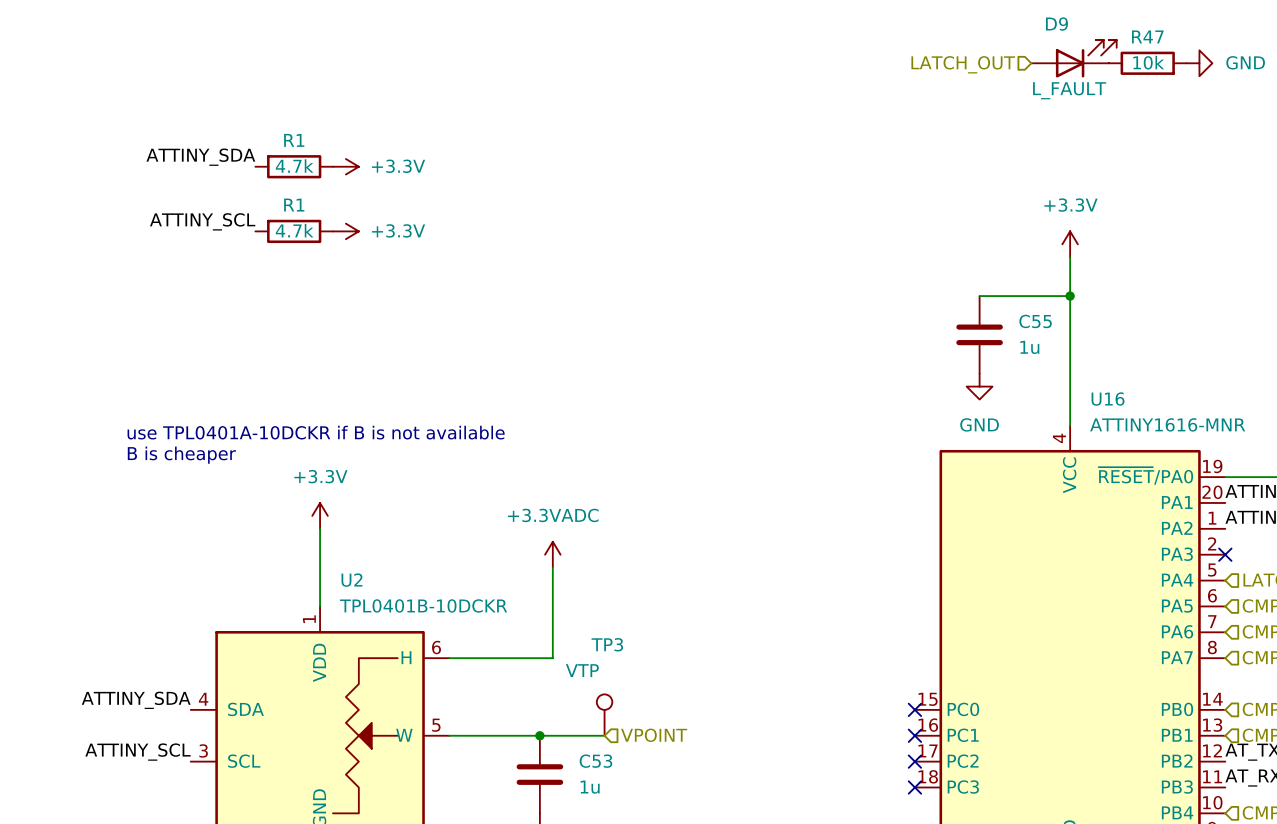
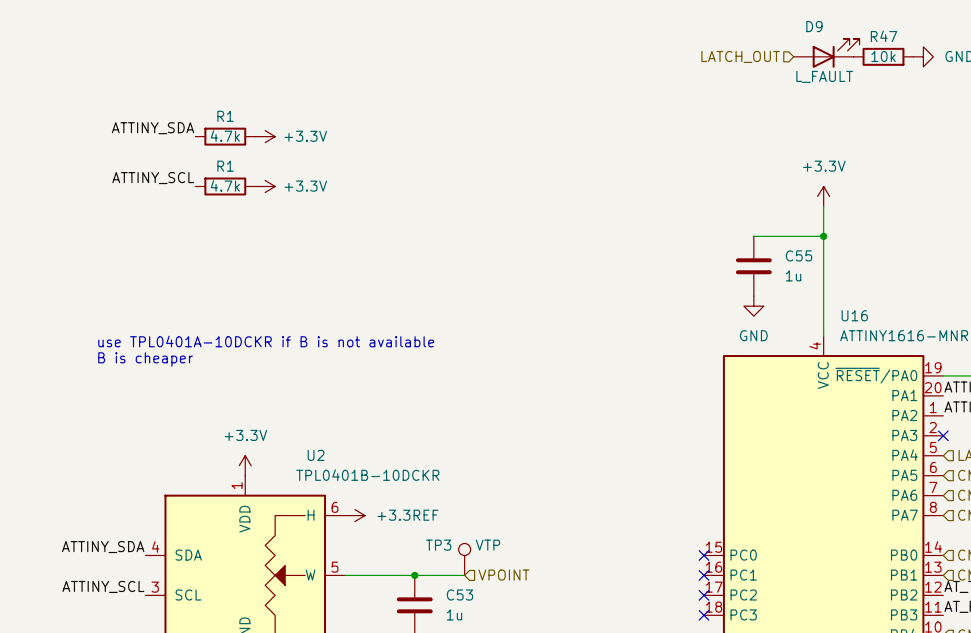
power symbol position: +3.3V (320, 515) -> +3.3V (245, 465)
wire: (320, 528) (320, 606) -> none
power symbol: +3.3VADC (552, 554) -> none
wire: (552, 567) (552, 658) (449, 658) -> none
U2 name position: U2 (351, 580) -> U2 (316, 455)
U2 value position: TPL0401B-10DCKR (423, 605) -> TPL0401B-10DCKR (367, 475)
TP3 name position: TP3 (607, 644) -> TP3 (438, 545)
power symbol: none -> +3.3REF (354, 515)
TP3 value position: VTP (582, 670) -> VTP (487, 545)

